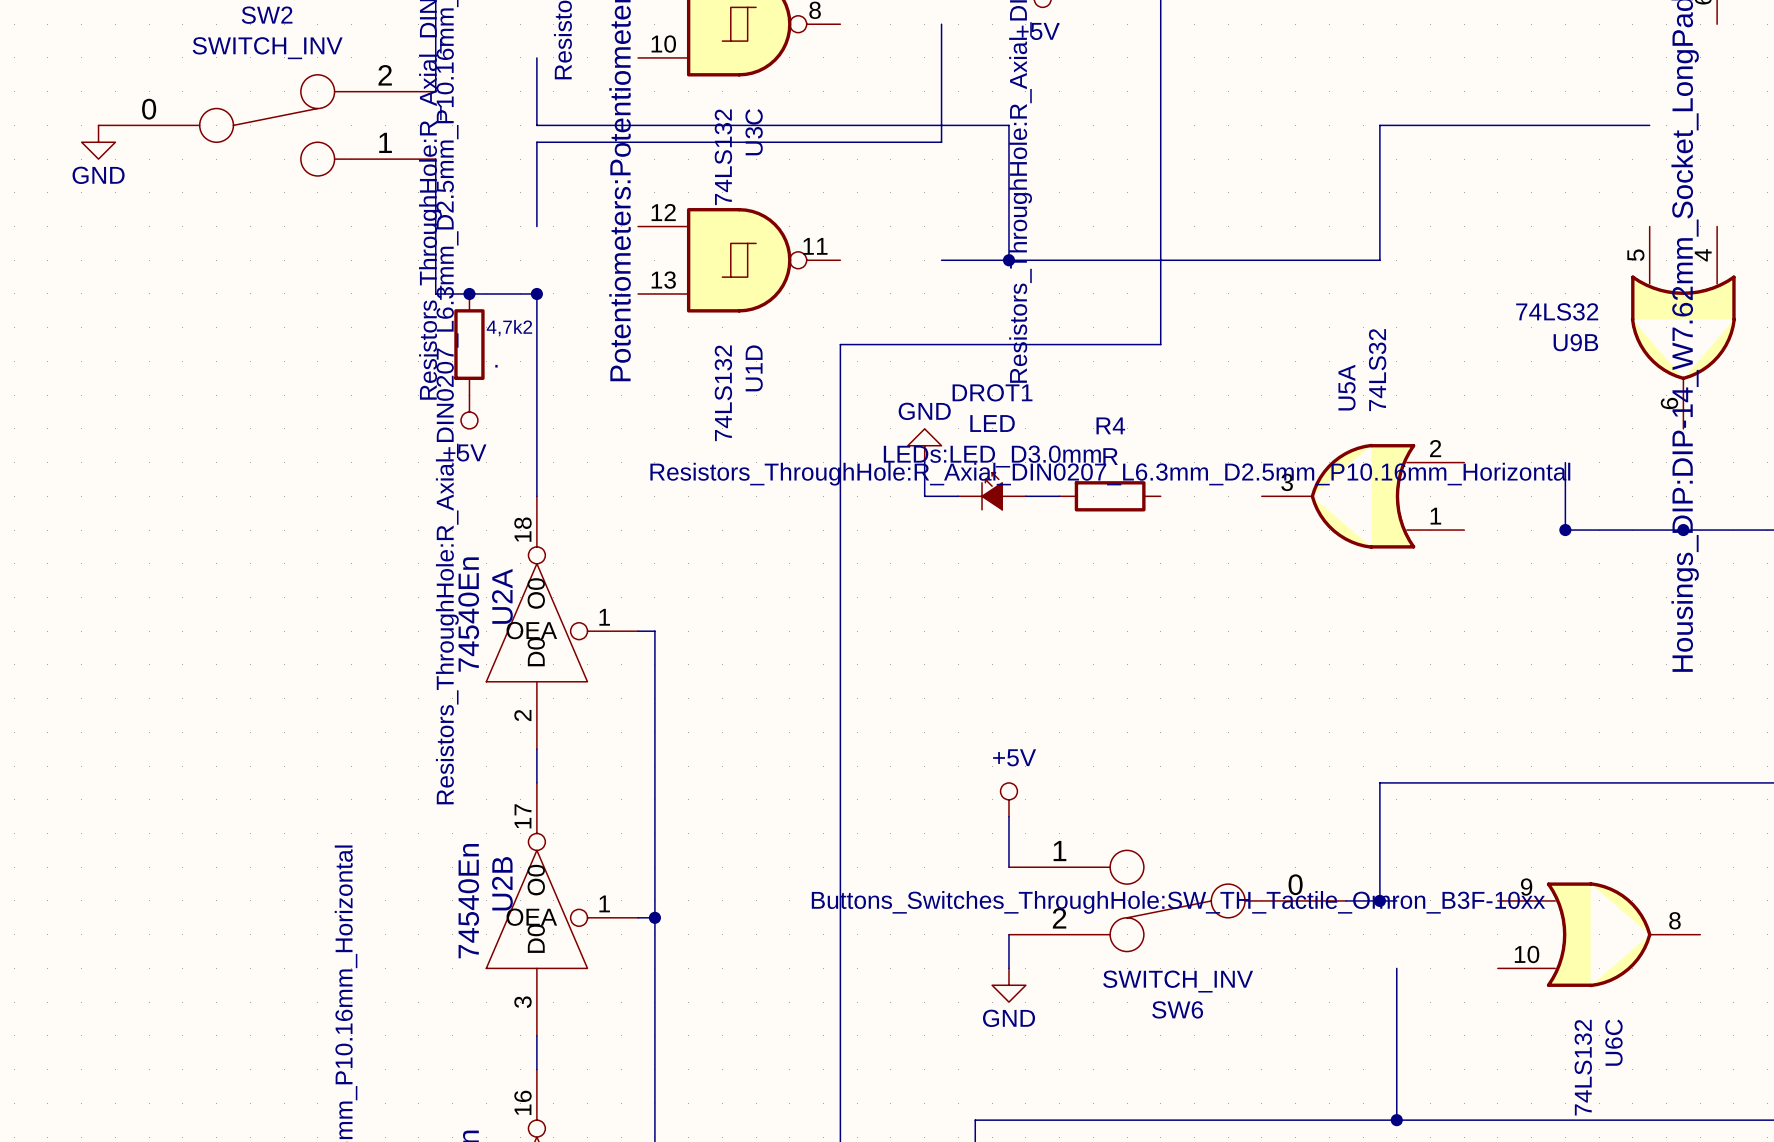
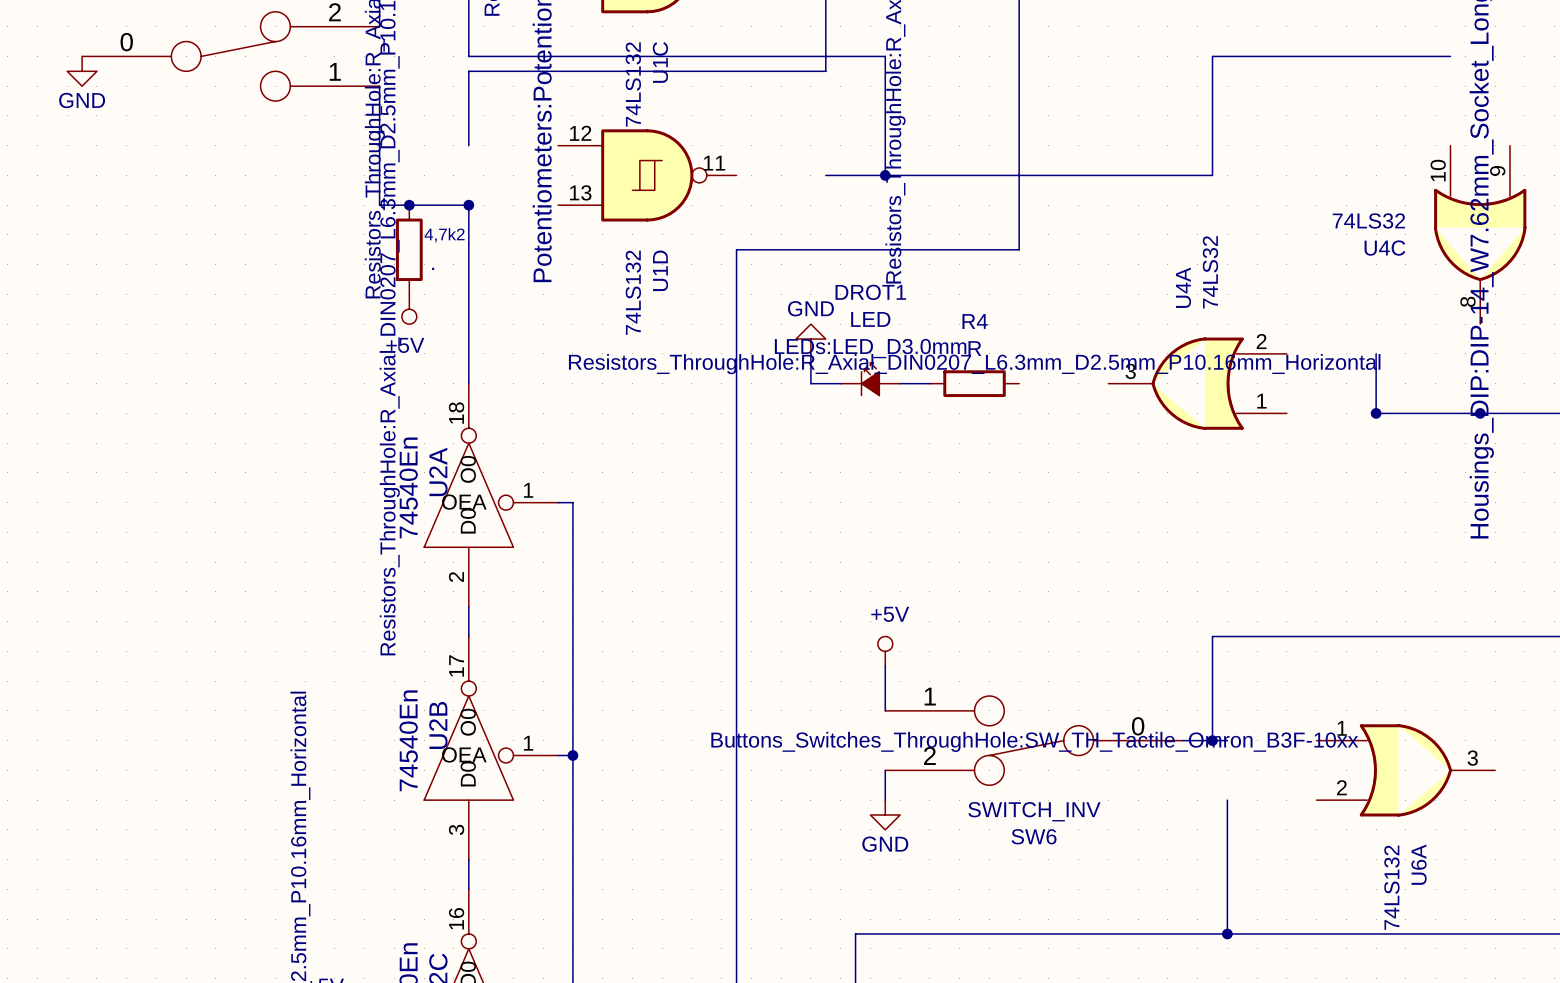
U3C name: U3C (754, 132) -> U1C (660, 62)
U9B pin number: 5 (1635, 255) -> 10 (1438, 170)
U9B pin number: 4 (1703, 255) -> 9 (1497, 170)
U9B name: U9B (1575, 342) -> U4C (1384, 248)
U5A name: U5A (1347, 387) -> U4A (1183, 287)
U9B pin number: 6 (1669, 403) -> 8 (1467, 301)
U6C pin number: 9 (1526, 887) -> 1 (1342, 728)
U6C pin number: 8 (1674, 920) -> 3 (1472, 758)
U6C pin number: 10 (1527, 954) -> 2 (1341, 787)
U6C name: U6C (1613, 1042) -> U6A (1418, 864)

